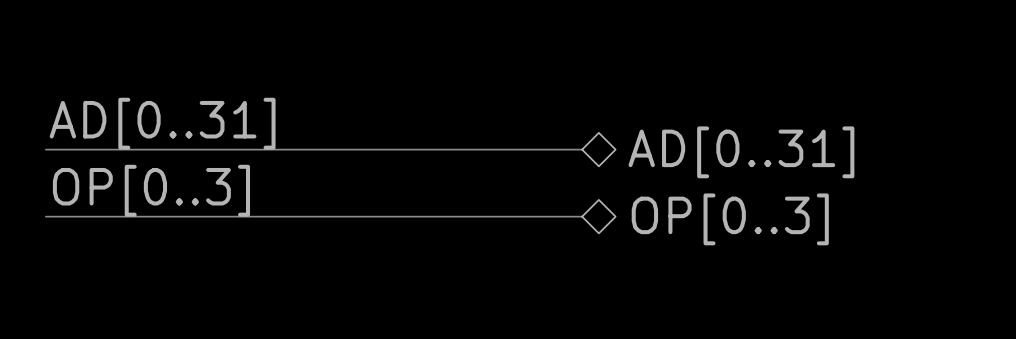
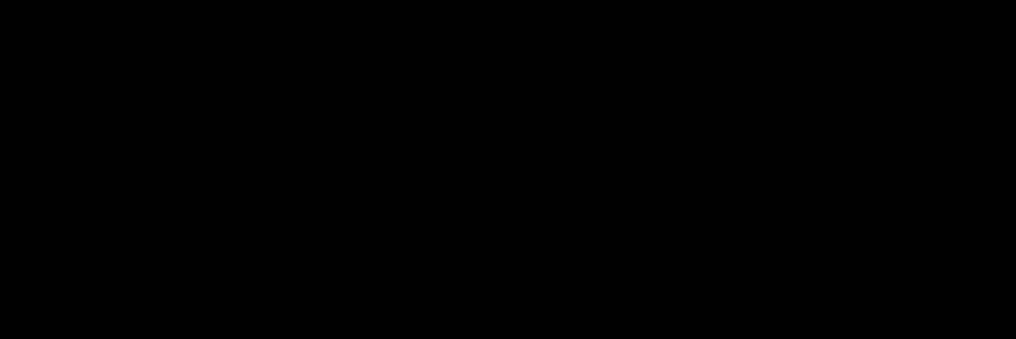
label: AD[0..31] (162, 123) -> none
bus: (45, 149) (582, 149) -> none
hierarchical label: AD[0..31] (741, 152) -> none
label: OP[0..3] (151, 190) -> none
bus: (45, 216) (582, 216) -> none
hierarchical label: OP[0..3] (730, 219) -> none

